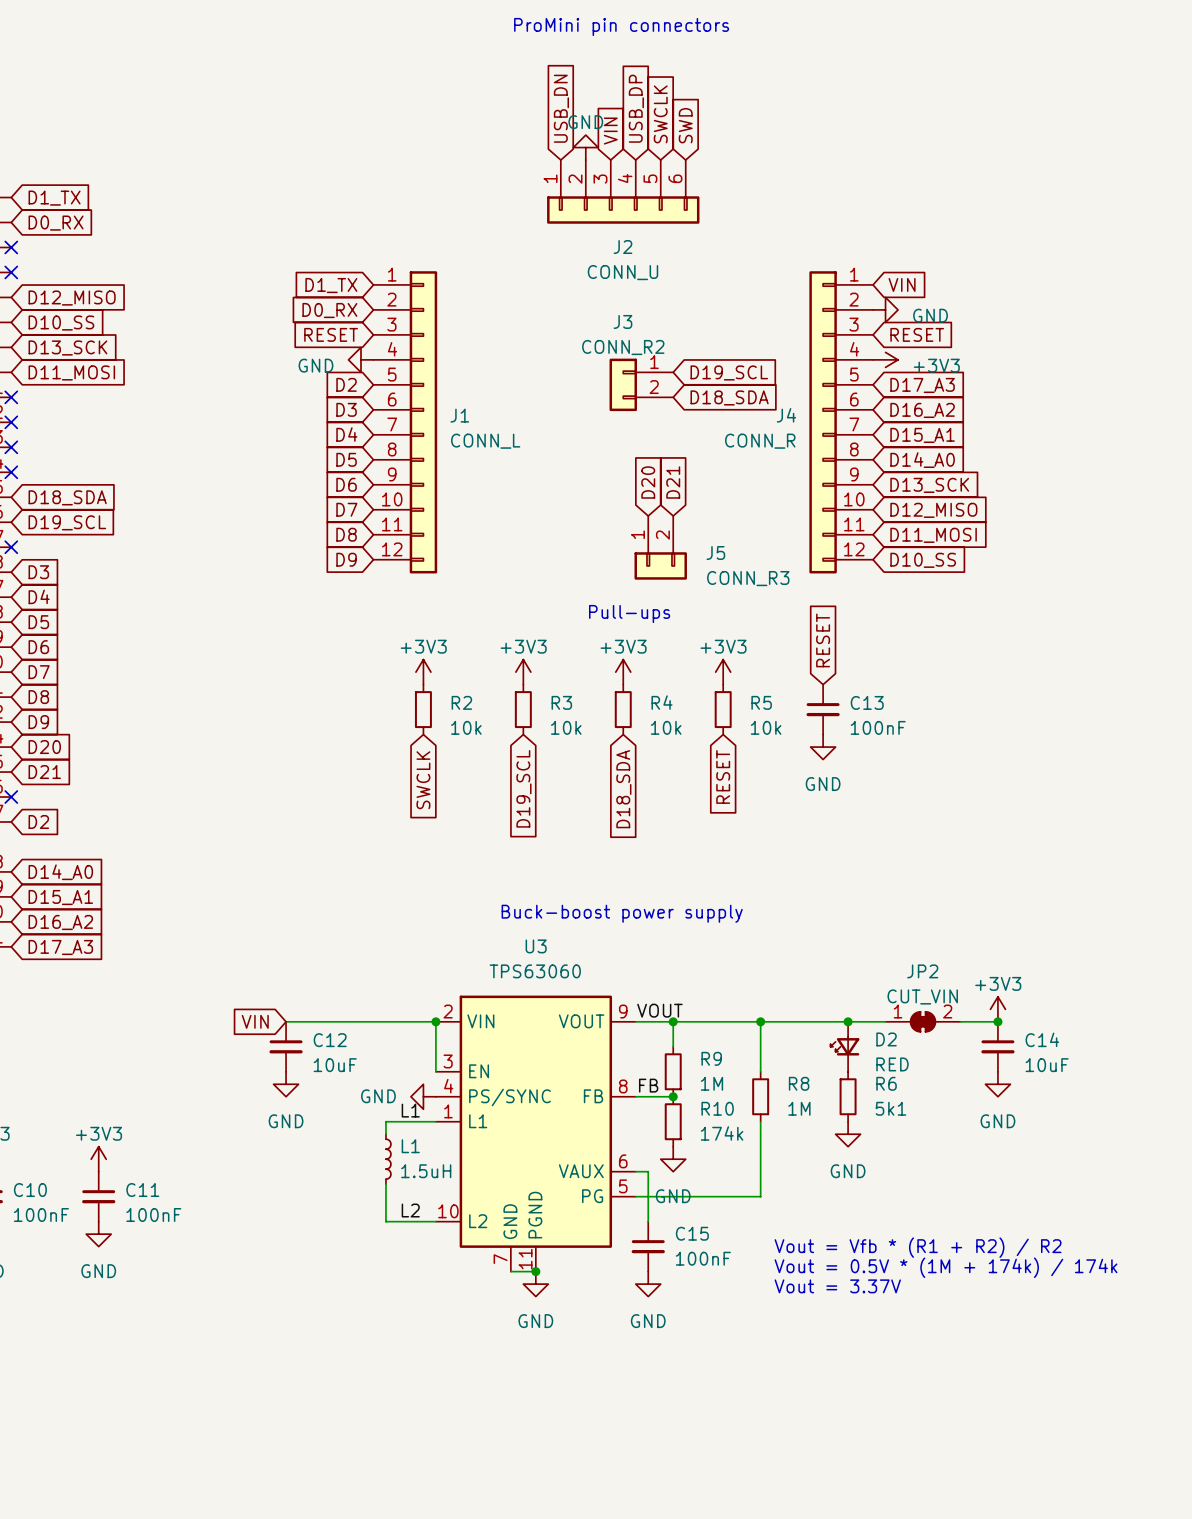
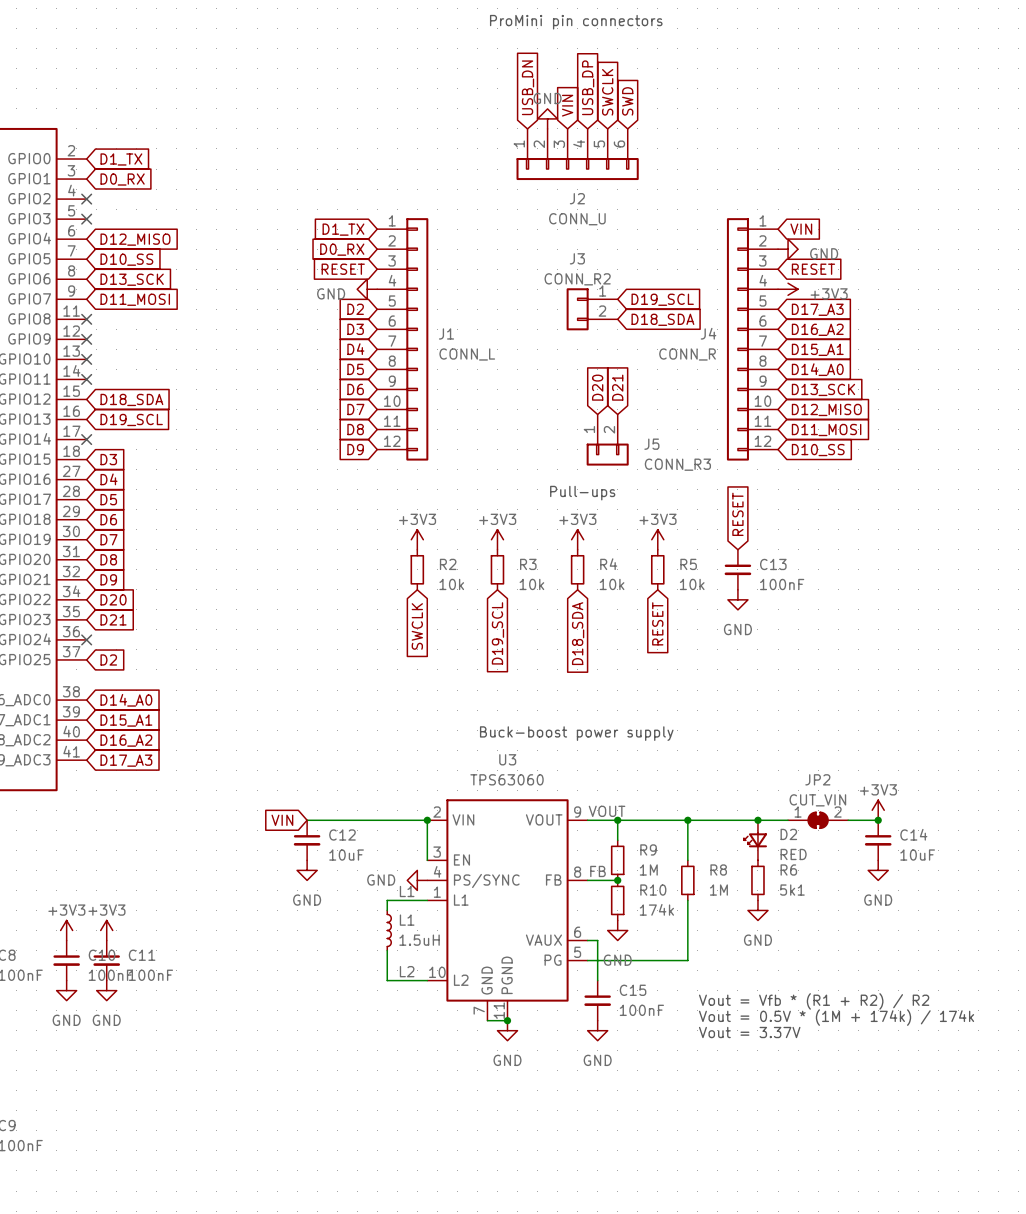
power symbol position: +3V3 (98, 1159) -> +3V3 (106, 930)
C11 position: (98, 1196) -> (106, 960)
power symbol position: GND (98, 1234) -> GND (106, 990)

